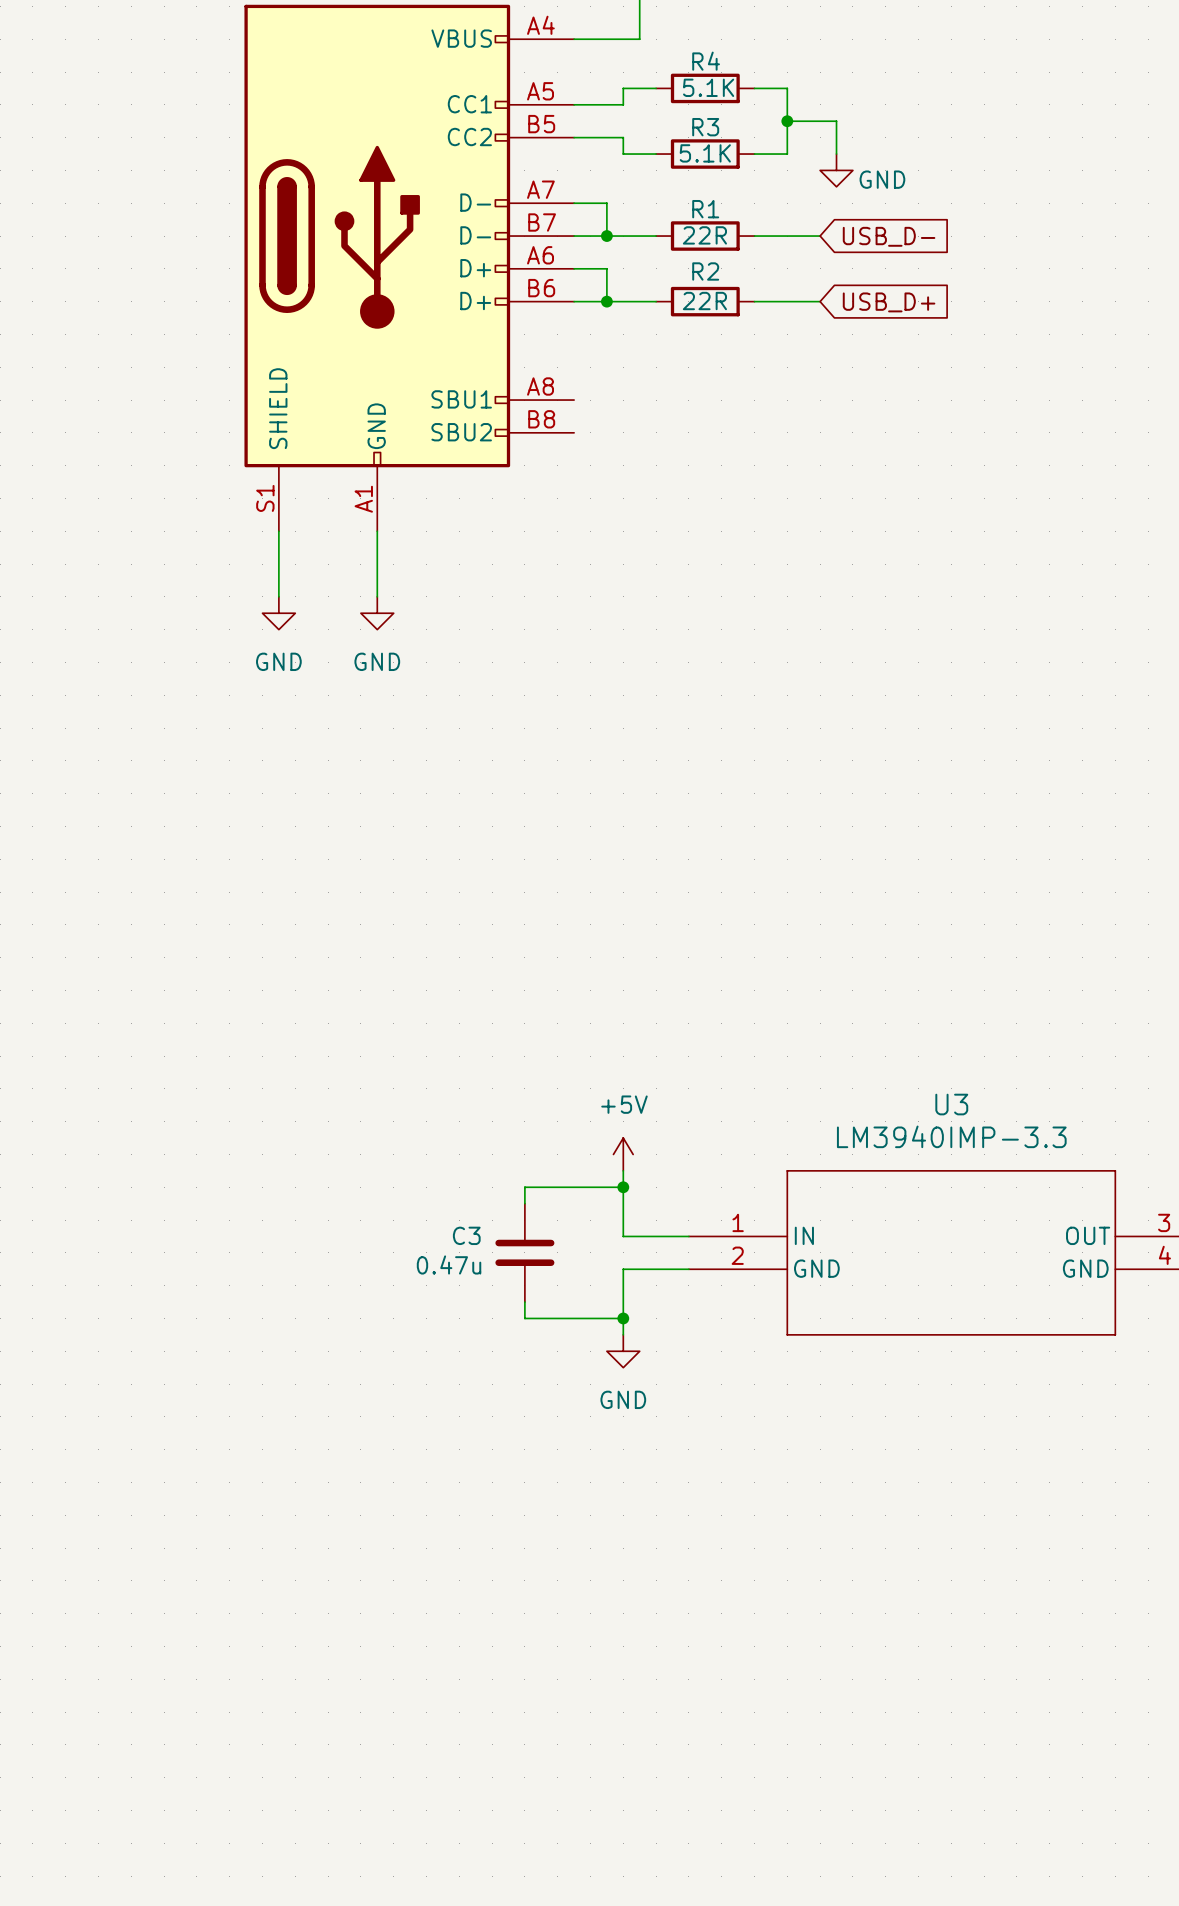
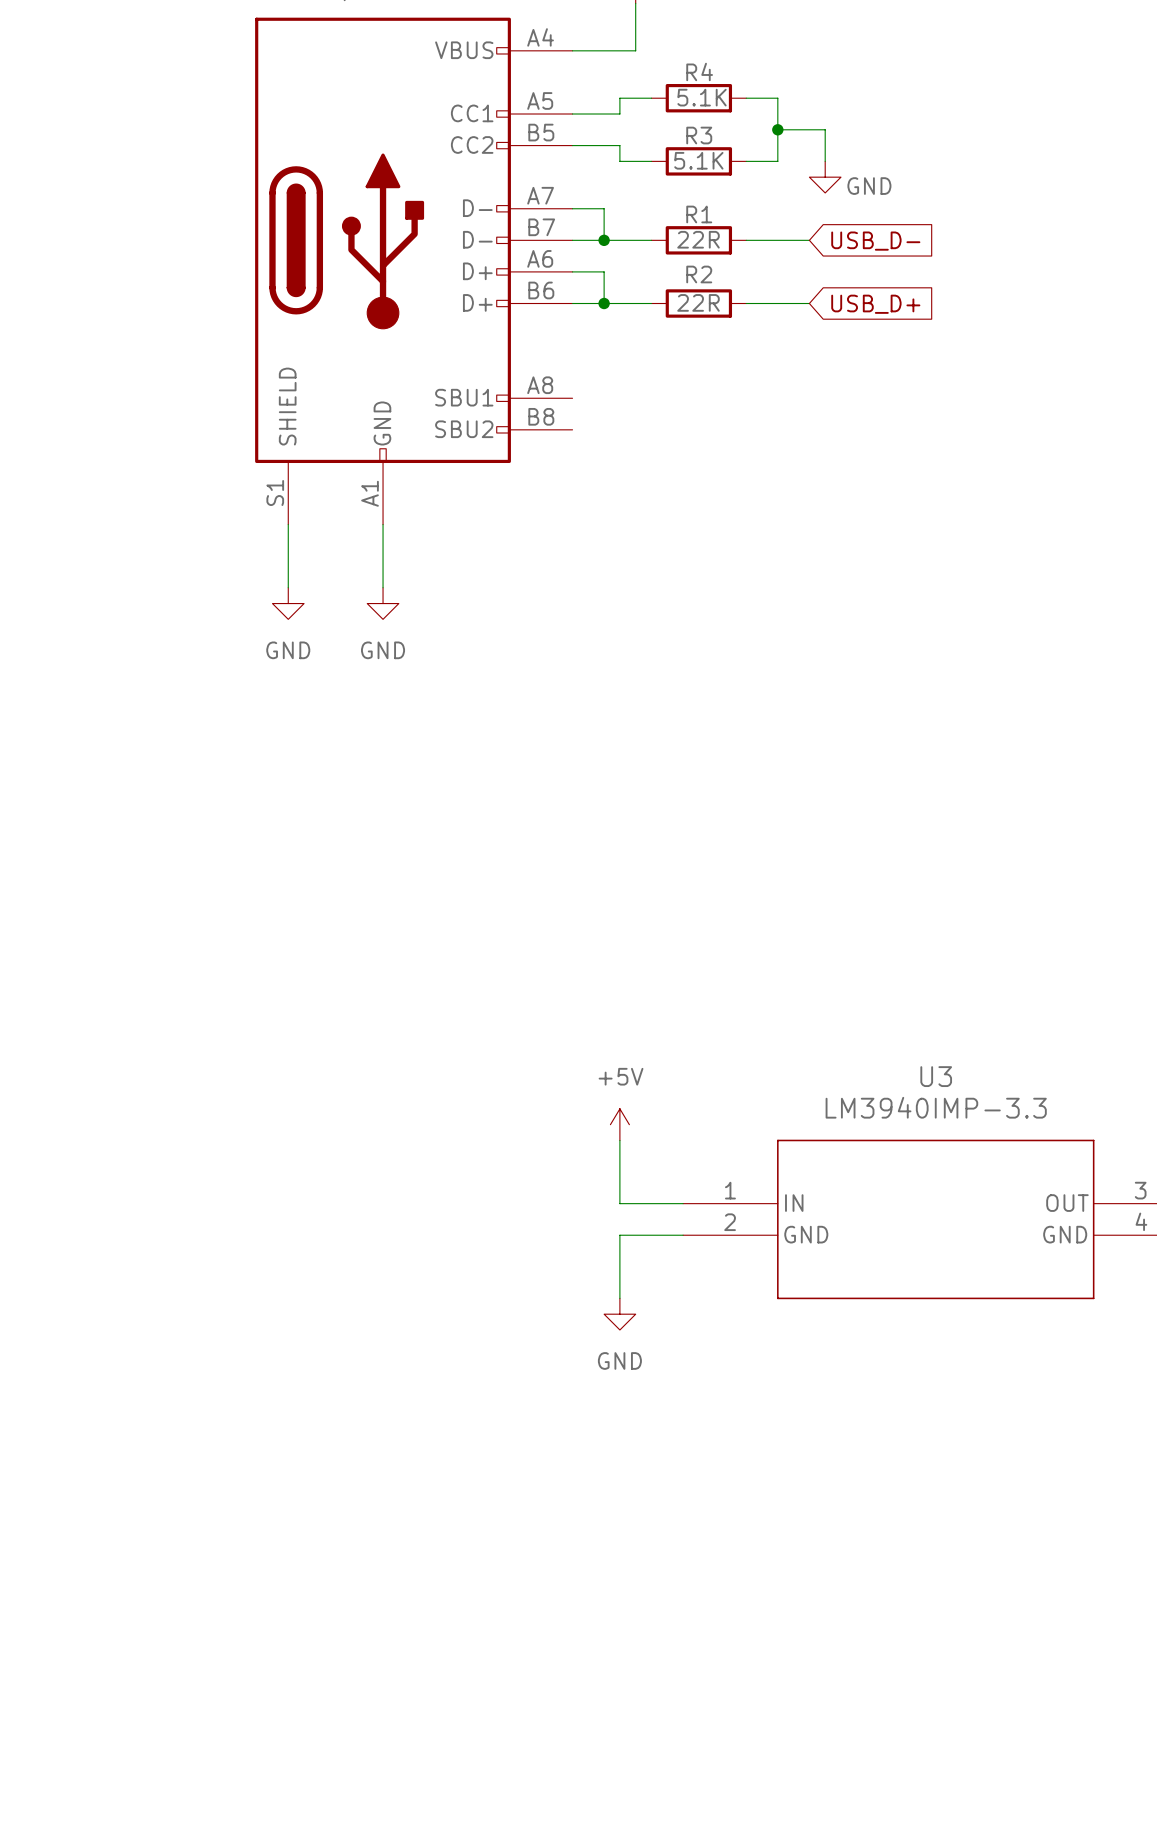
wire: (623, 1187) (524, 1187) (524, 1203) -> none
junction: (623, 1187) -> none
C3: 0.47u (524, 1252) -> none
wire: (524, 1302) (524, 1318) (623, 1318) -> none
junction: (623, 1318) -> none

